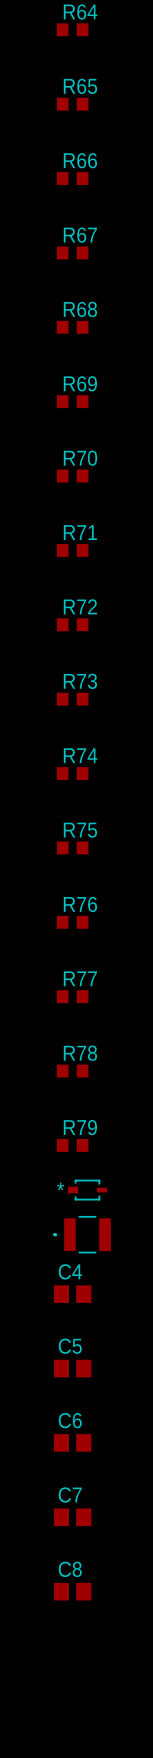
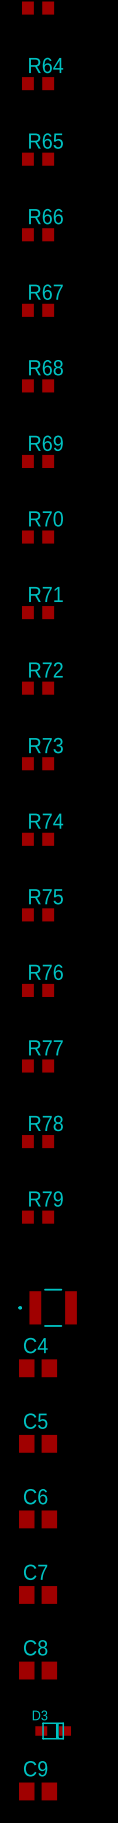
part: (87, 1190) -> none
D3: none -> (53, 1731)
C9: none -> (38, 1791)

